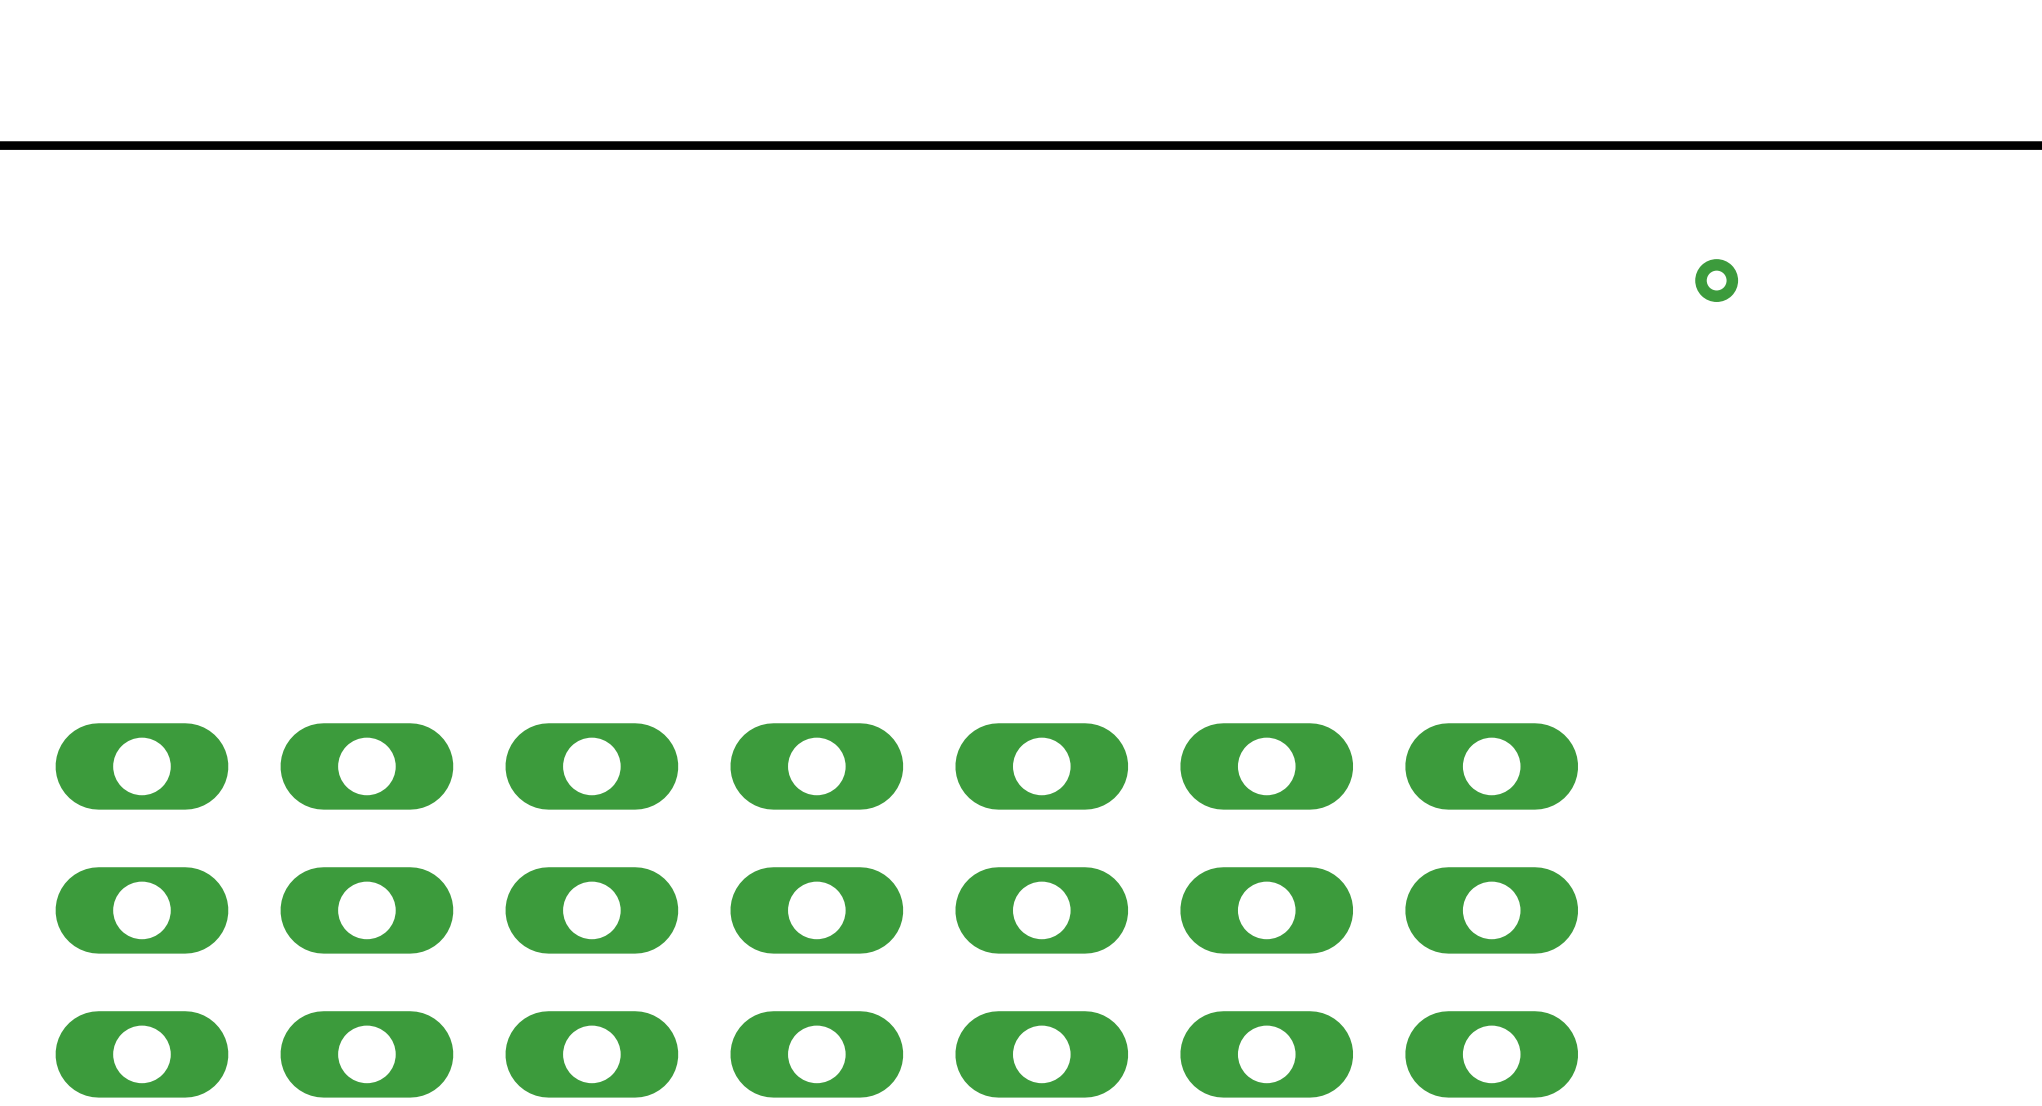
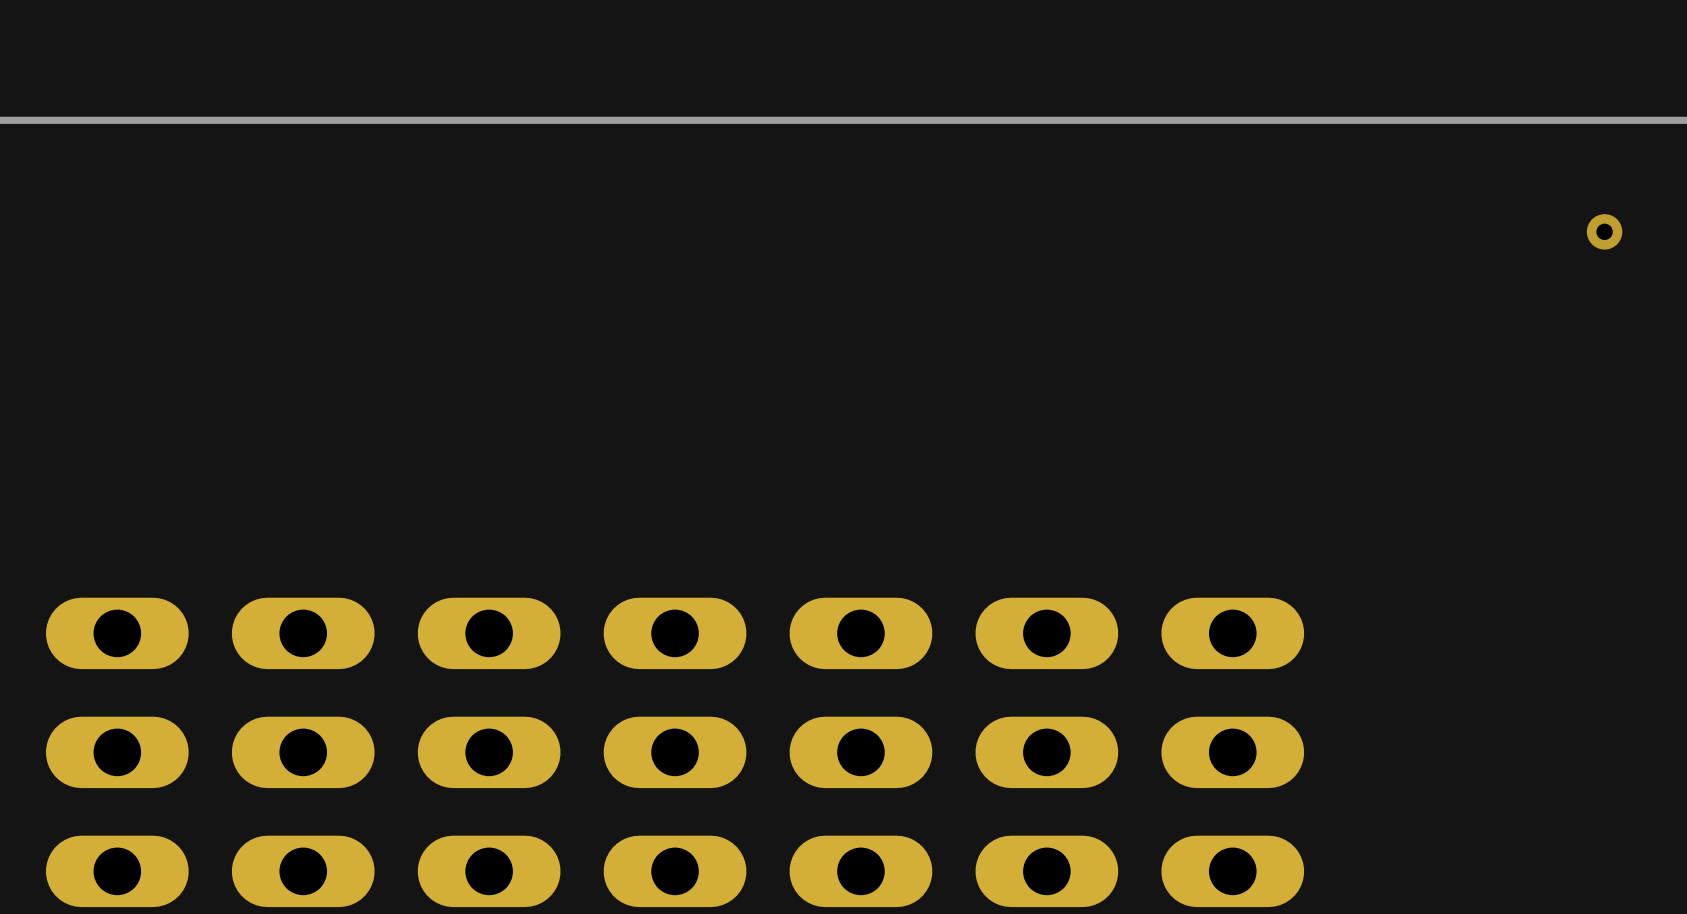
via position: (1716, 280) -> (1604, 231)

